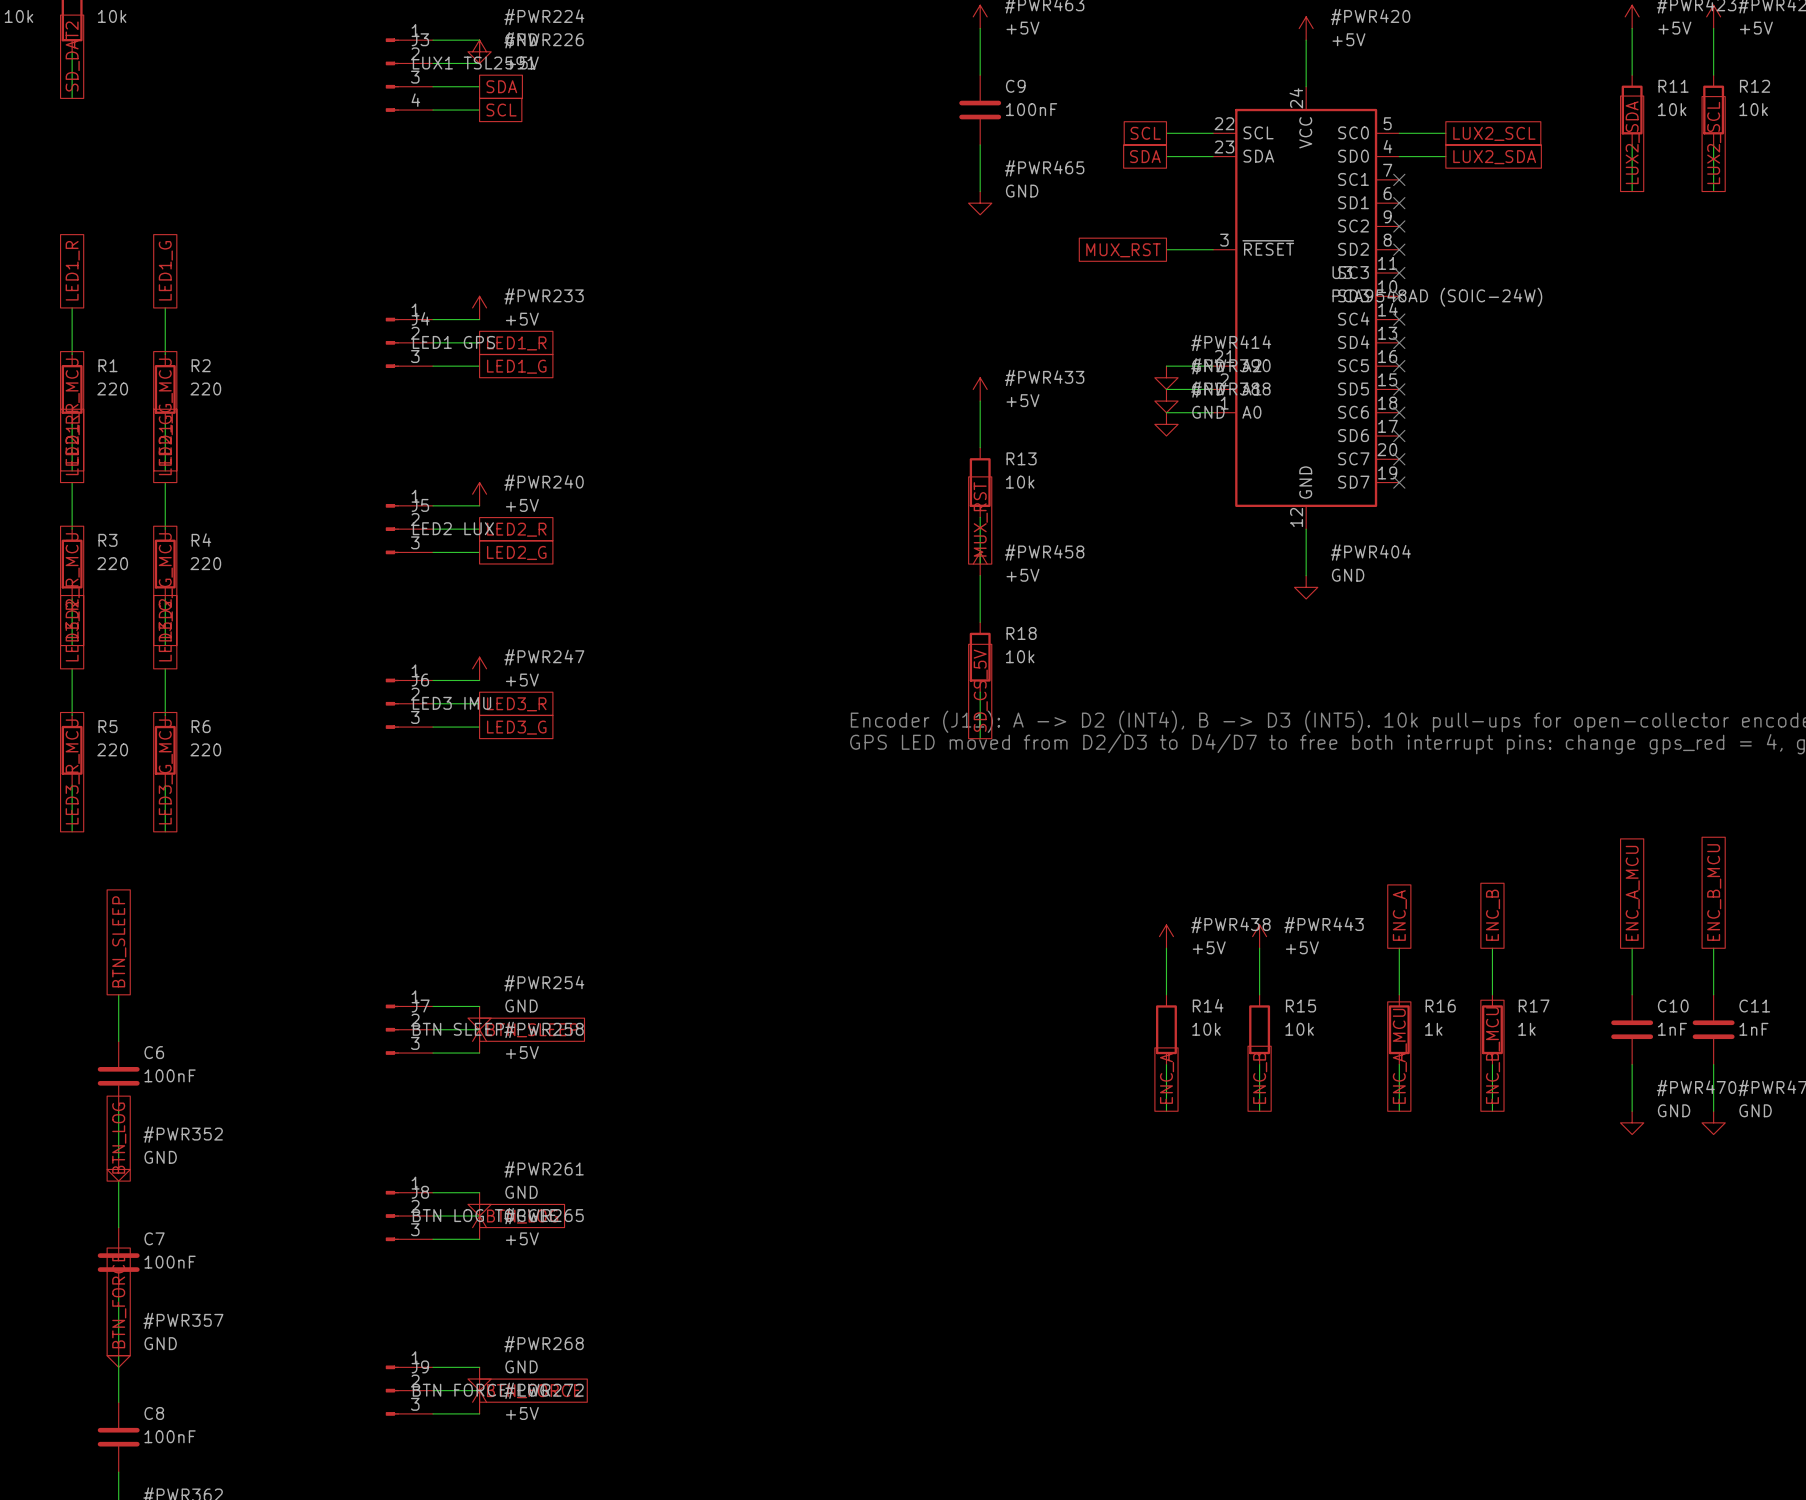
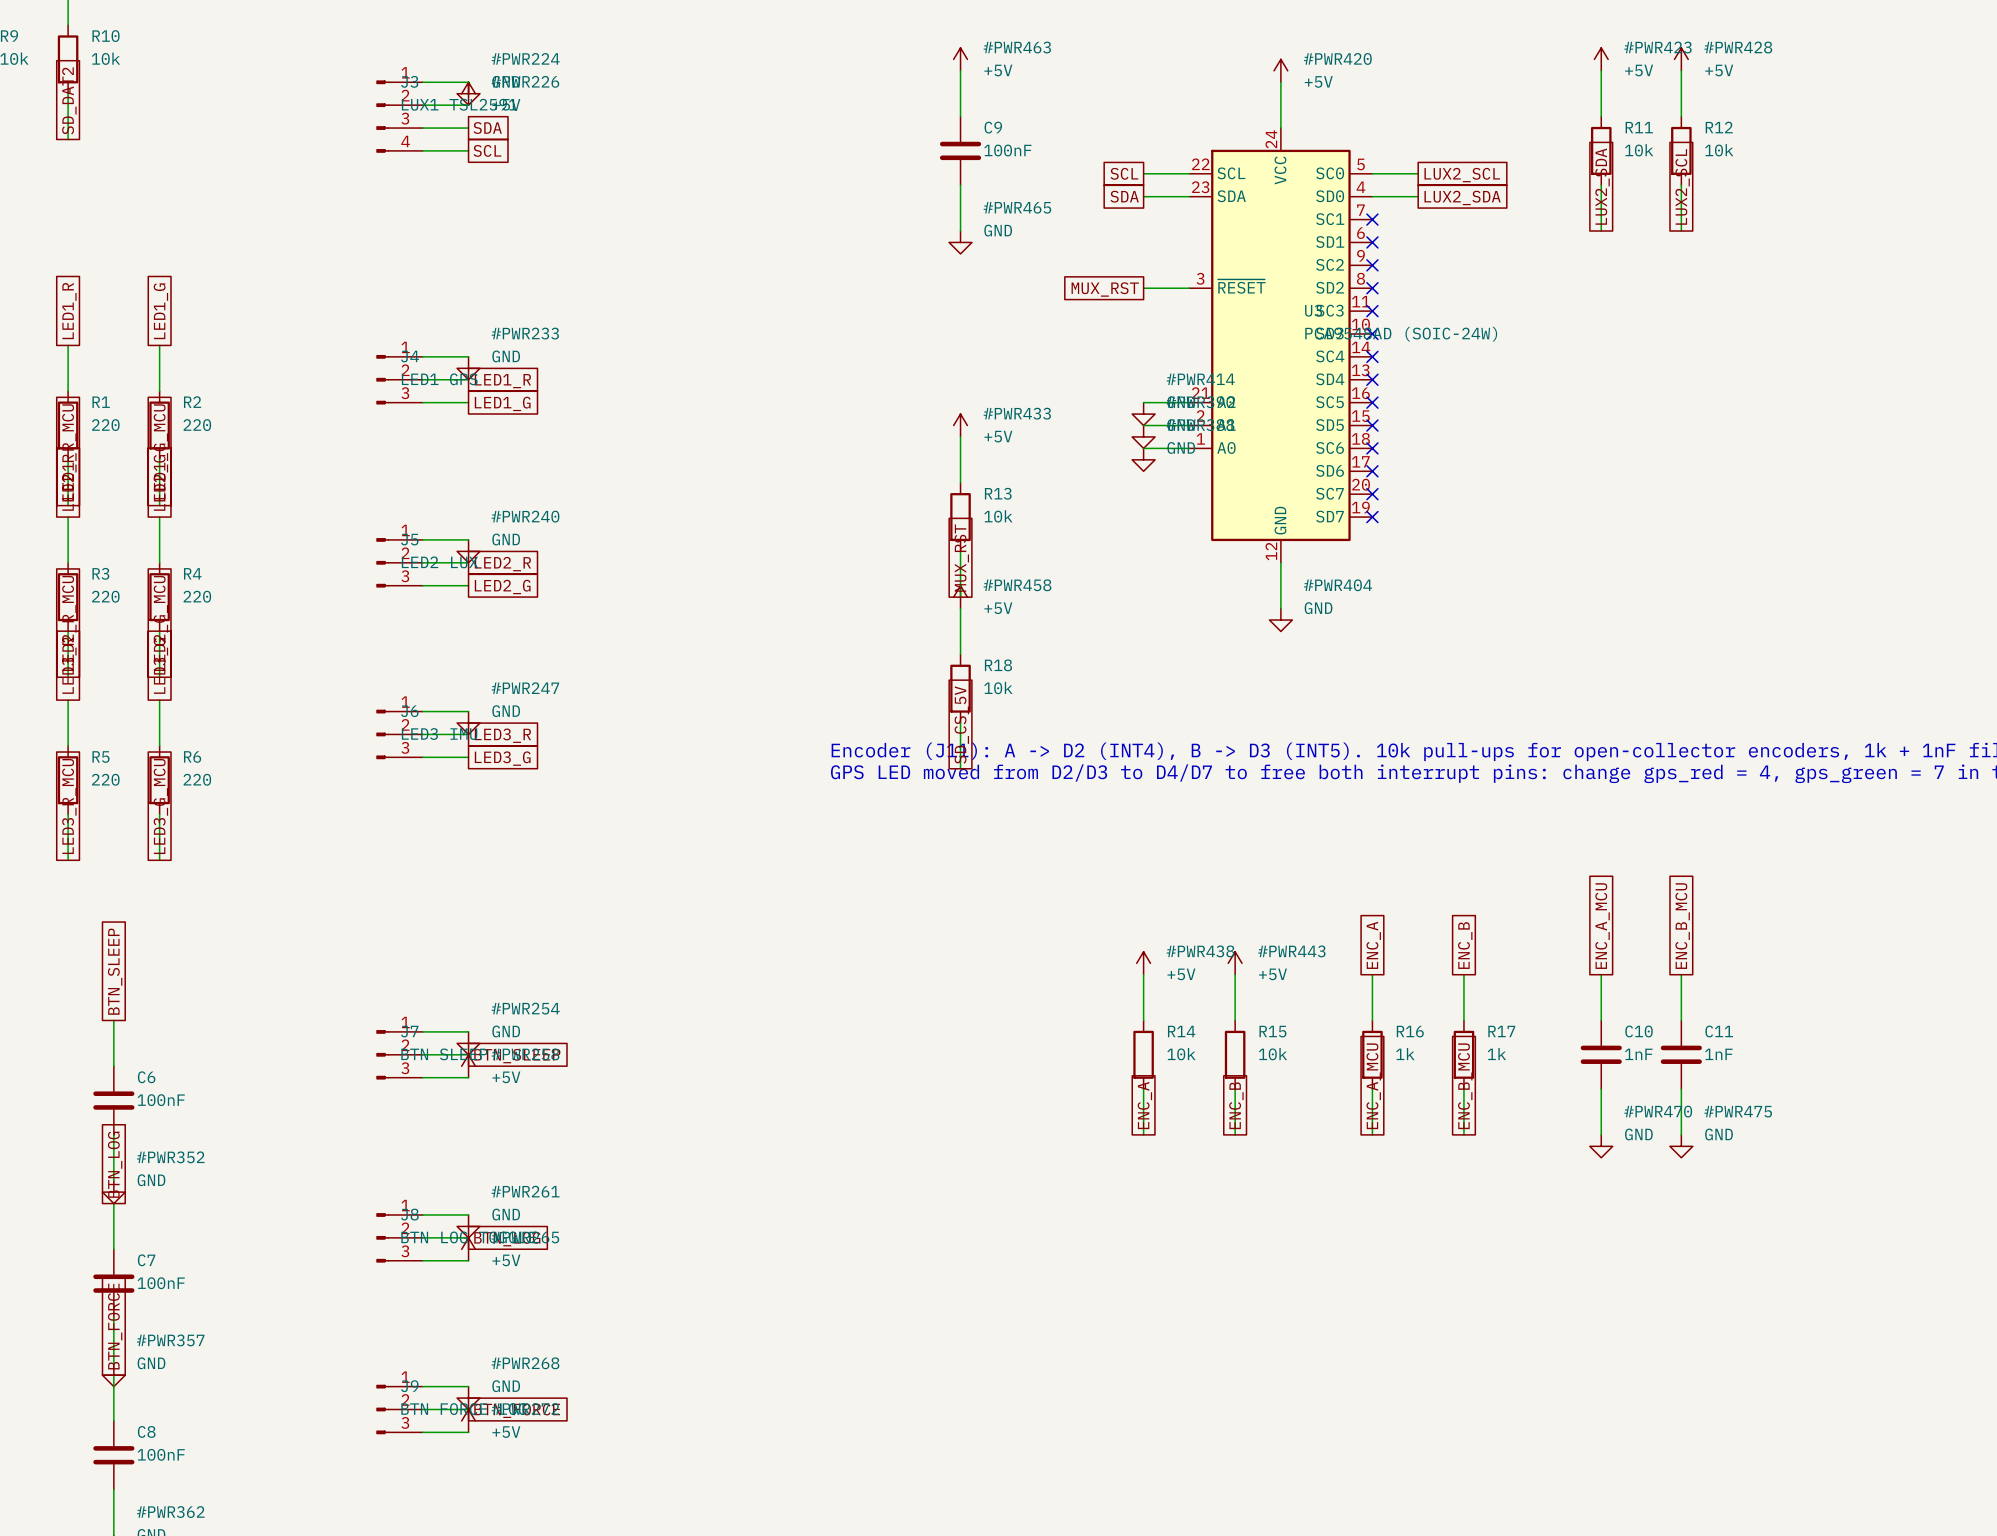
power symbol: +5V (479, 307) -> GND (468, 368)
power symbol: +5V (479, 494) -> GND (468, 551)
power symbol: +5V (479, 668) -> GND (468, 723)

